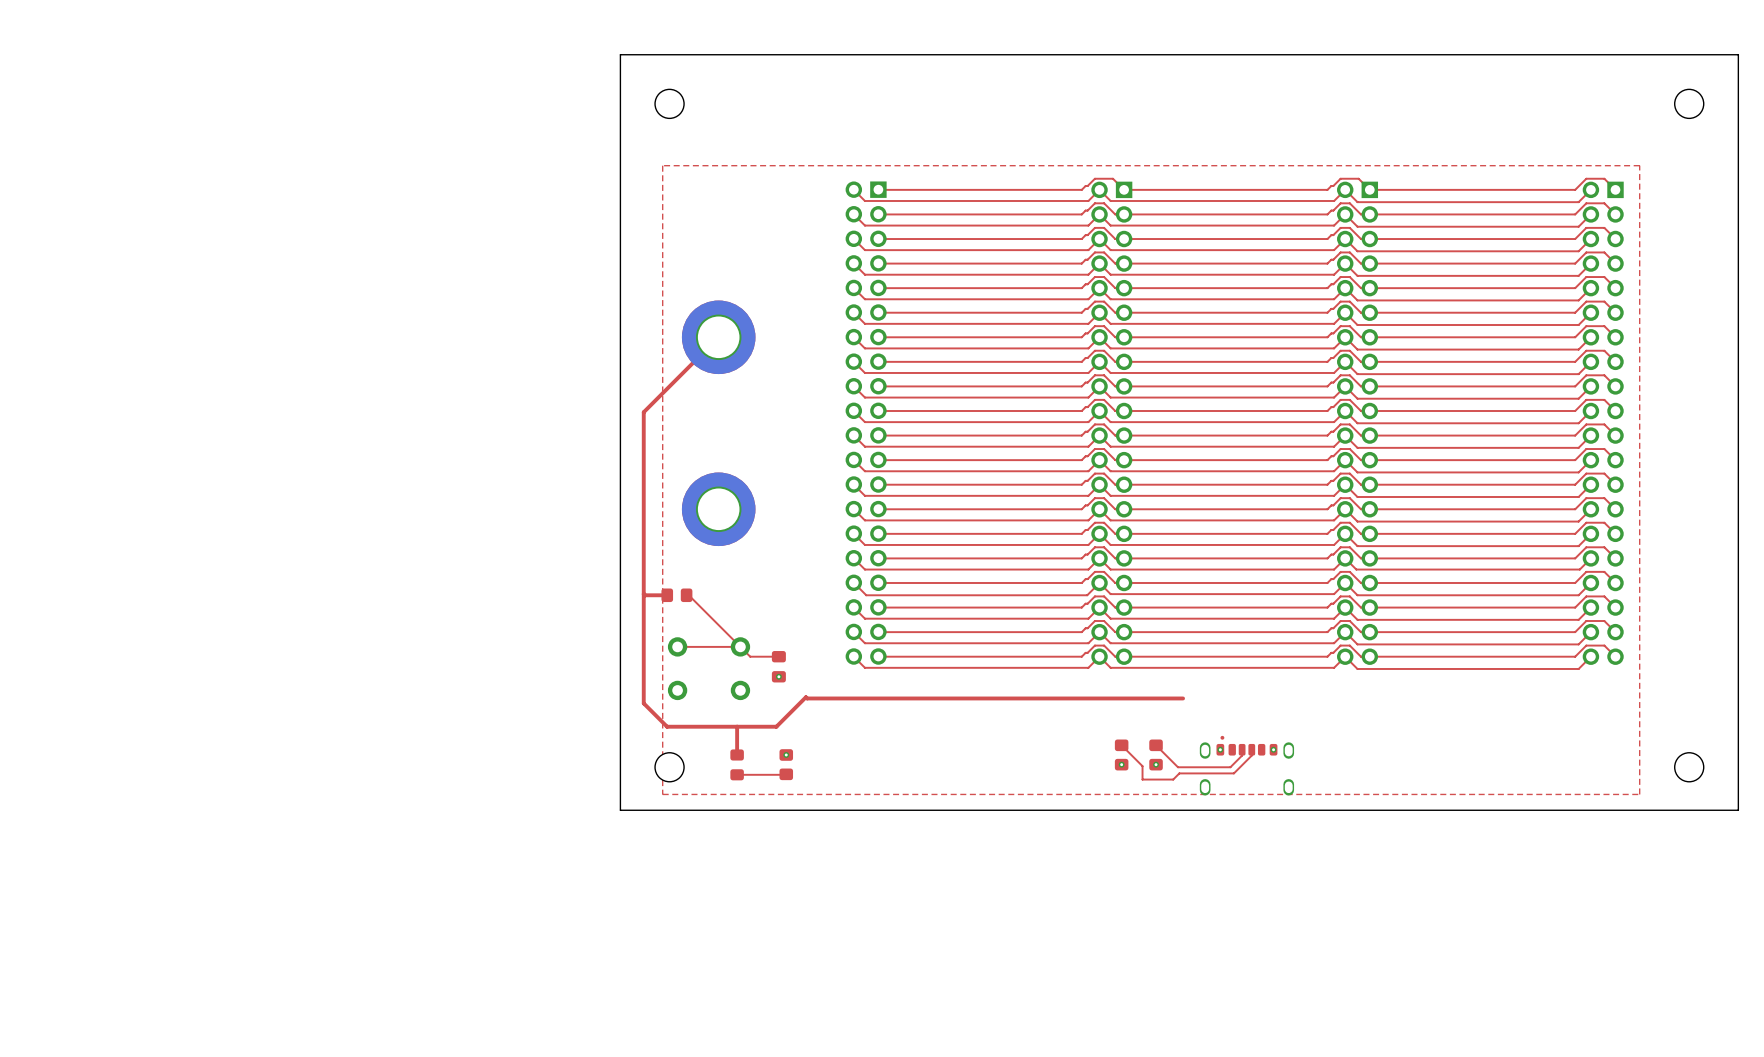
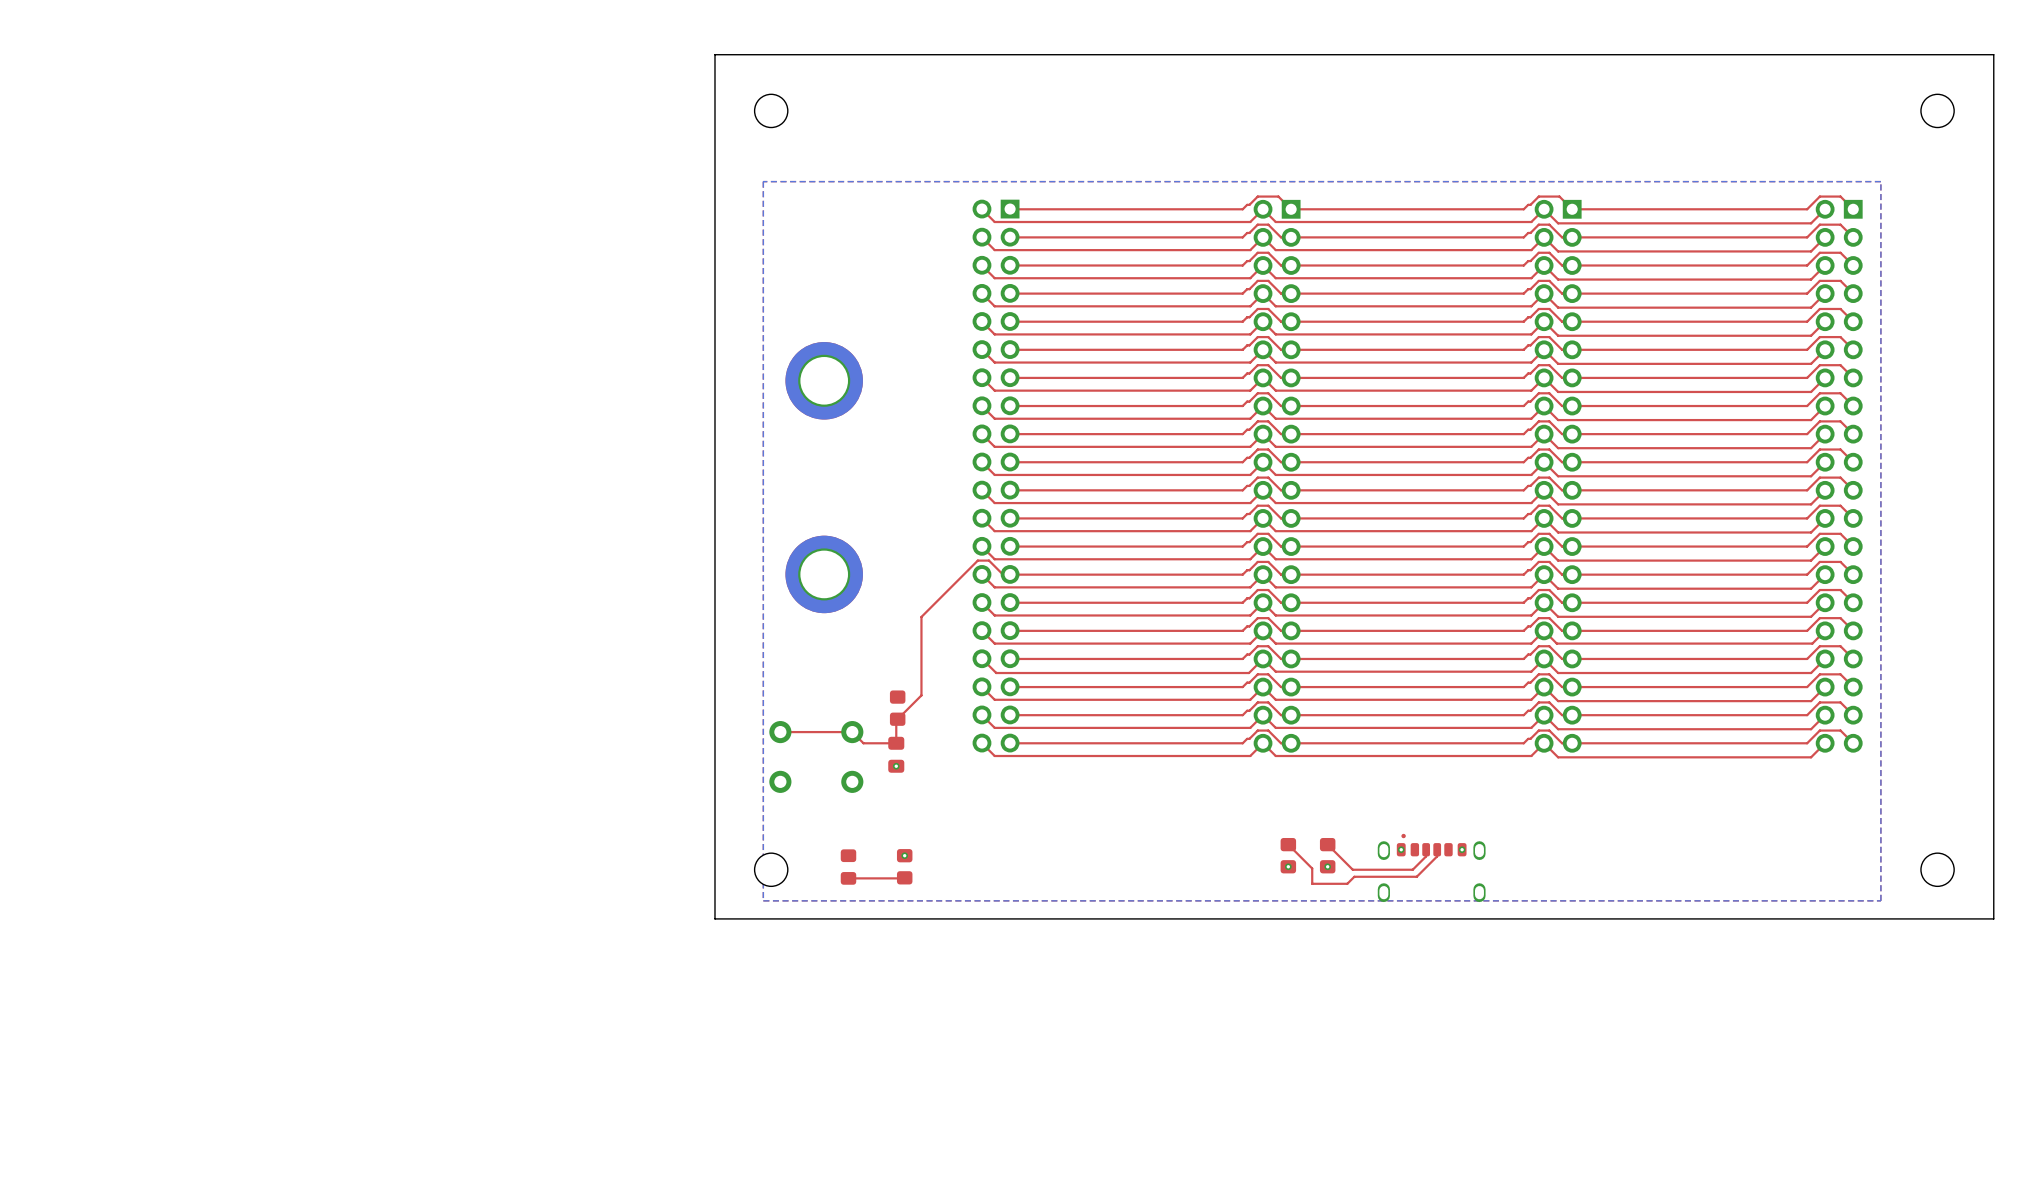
bottom zone outline: none -> (1880, 181) (763, 181) (763, 900) (1880, 900) (1880, 181)
part footprint: [681, 300, 756, 375] -> [785, 342, 863, 420]
top track: (699, 356) (643, 412) (643, 703) (667, 726) (776, 726) (805, 697) (1183, 698) -> none
part footprint: [681, 472, 756, 547] -> [785, 535, 863, 614]
top track: none -> (1010, 574) (1002, 574) (989, 560) (977, 560) (921, 616) (921, 695) (896, 720) (896, 743)
top track: (643, 594) (667, 595) -> none
part rotation: 0° (676, 595) -> 90° clockwise (897, 708)
part position: (676, 595) -> (897, 708)
top track: (686, 595) (688, 595) (740, 646) -> none
top track: (737, 726) (737, 754) -> none

